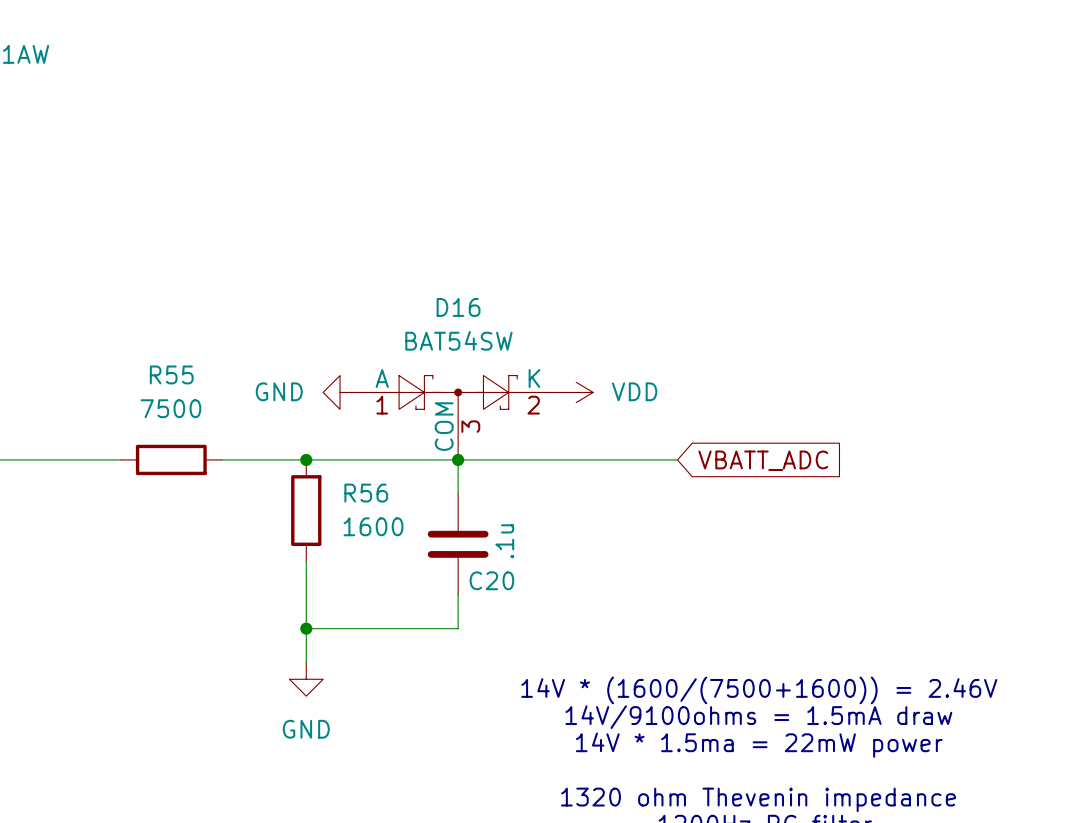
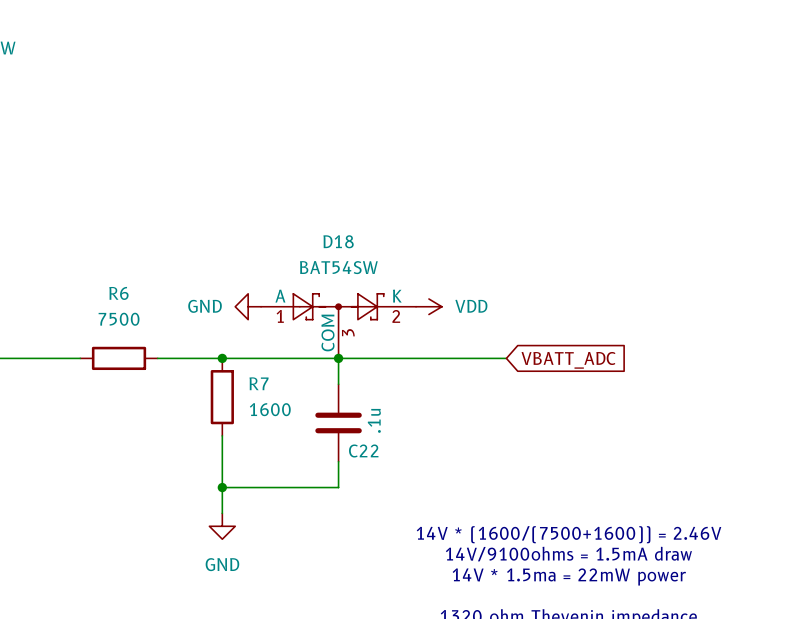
D16 name: D16 (458, 307) -> D18 (338, 241)
R55 name: R55 (171, 374) -> R6 (118, 293)
R56 name: R56 (366, 493) -> R7 (259, 383)
C20 name: C20 (491, 580) -> C22 (363, 450)

